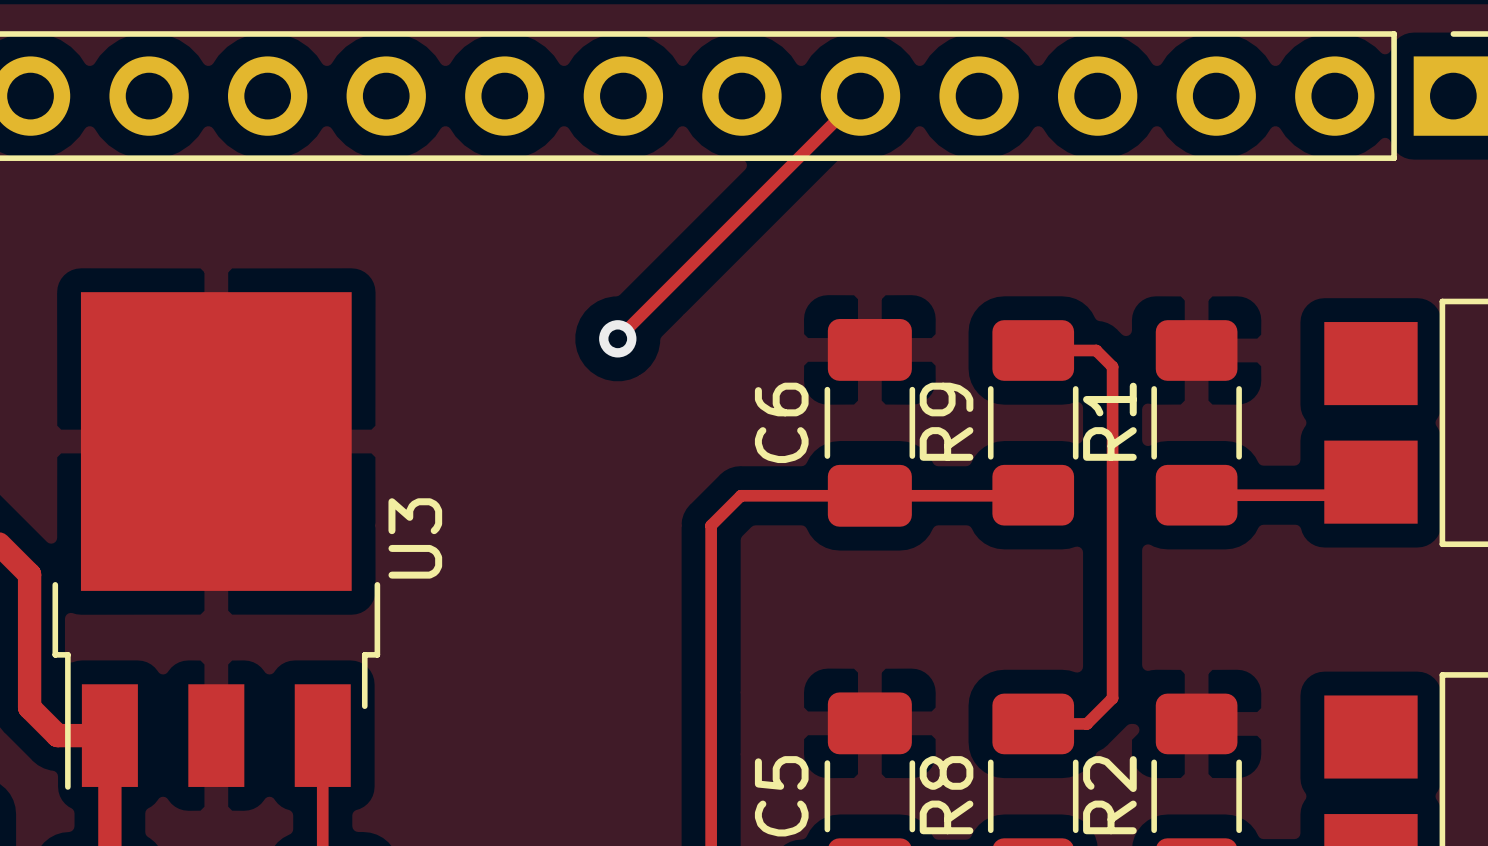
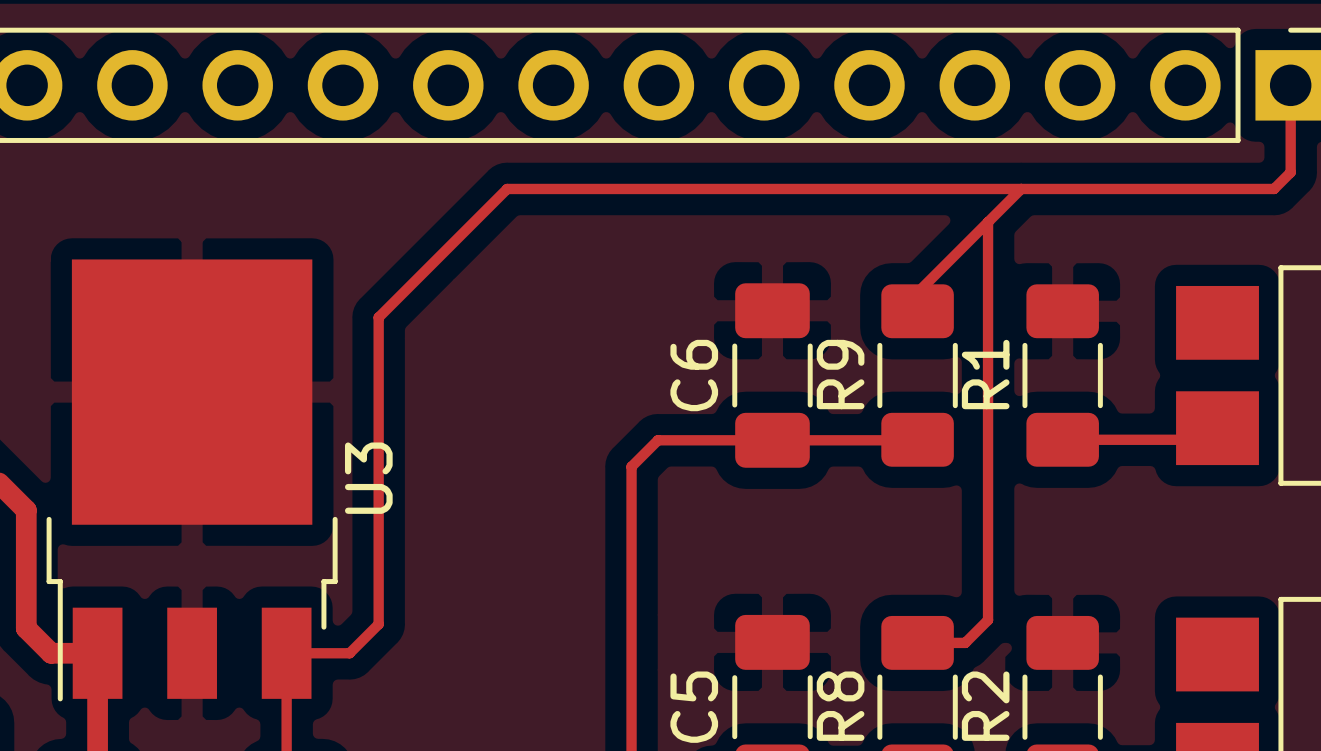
track: (860, 96) (617, 338) -> none
track: none -> (1290, 85) (1290, 172) (1274, 188) (507, 188) (378, 317) (378, 624) (349, 653) (286, 653)
track: none -> (1021, 188) (917, 292)
via: (617, 338) -> none
track: (1033, 350) (1096, 350) (1112, 366) -> (988, 222) (988, 325)

